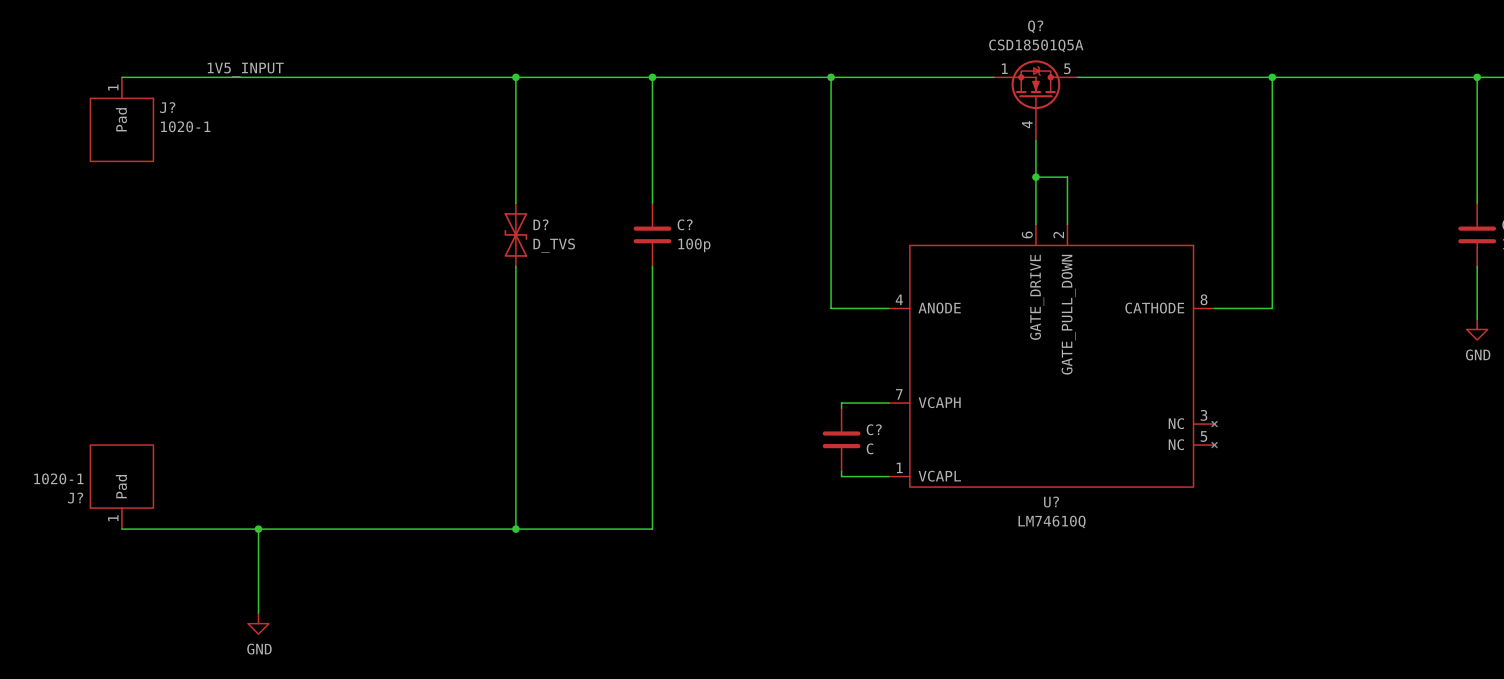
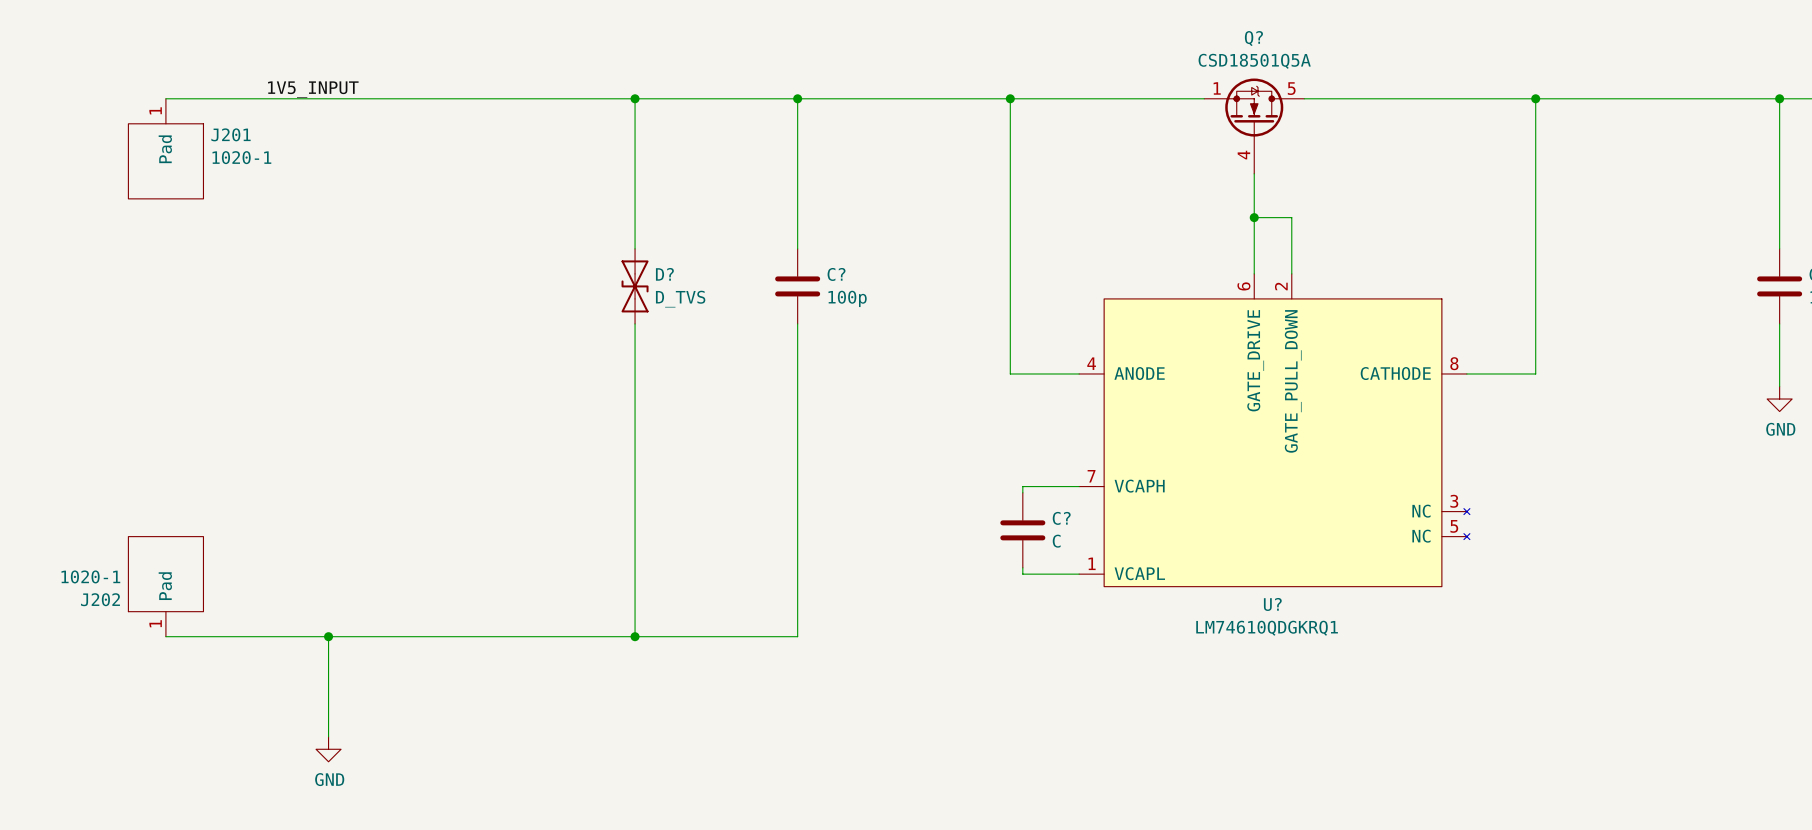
J? name: J? (167, 107) -> J201 (231, 134)
J? name: J? (75, 498) -> J202 (100, 599)
U? value: LM74610Q (1052, 522) -> LM74610QDGKRQ1 (1267, 628)

